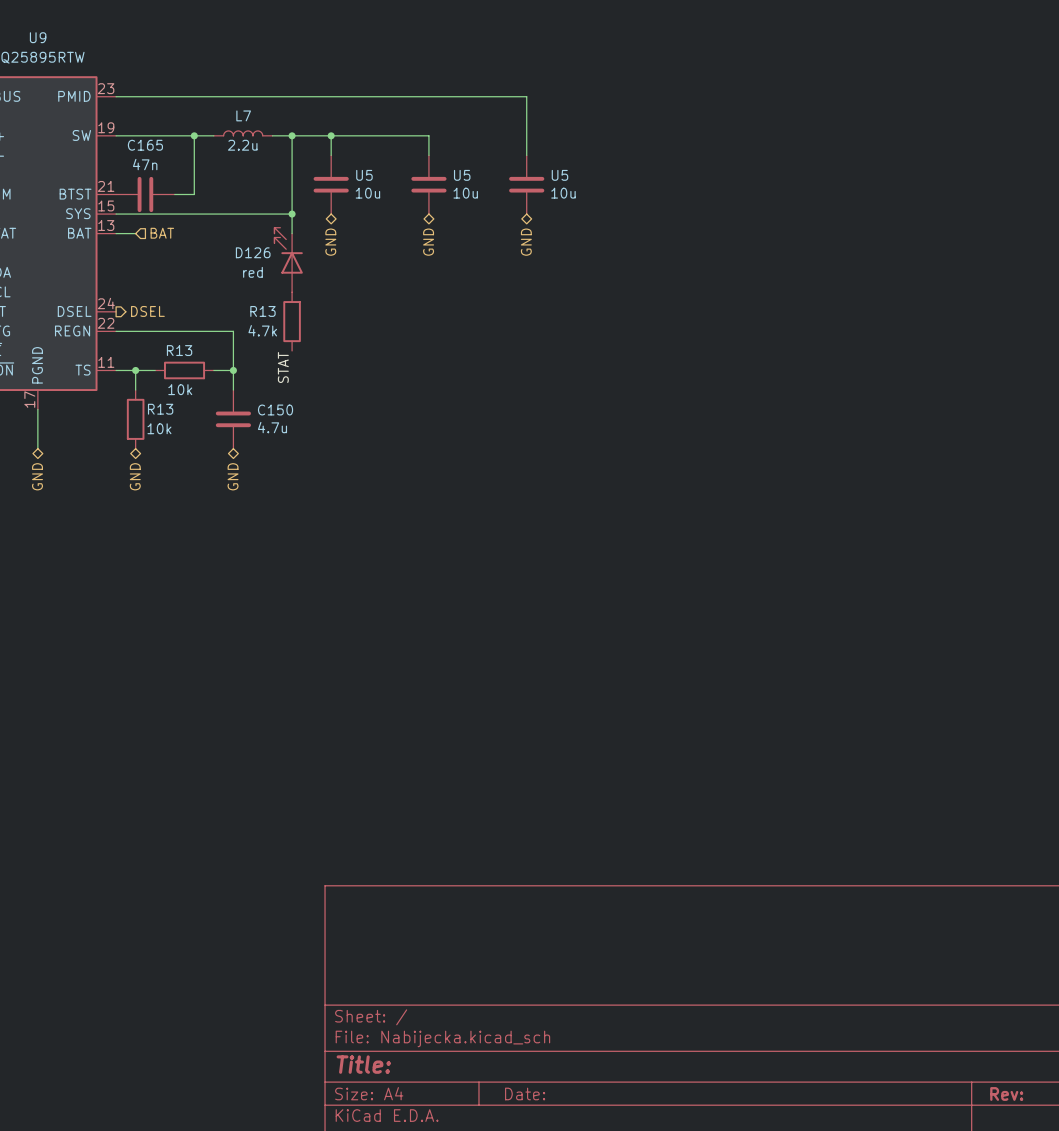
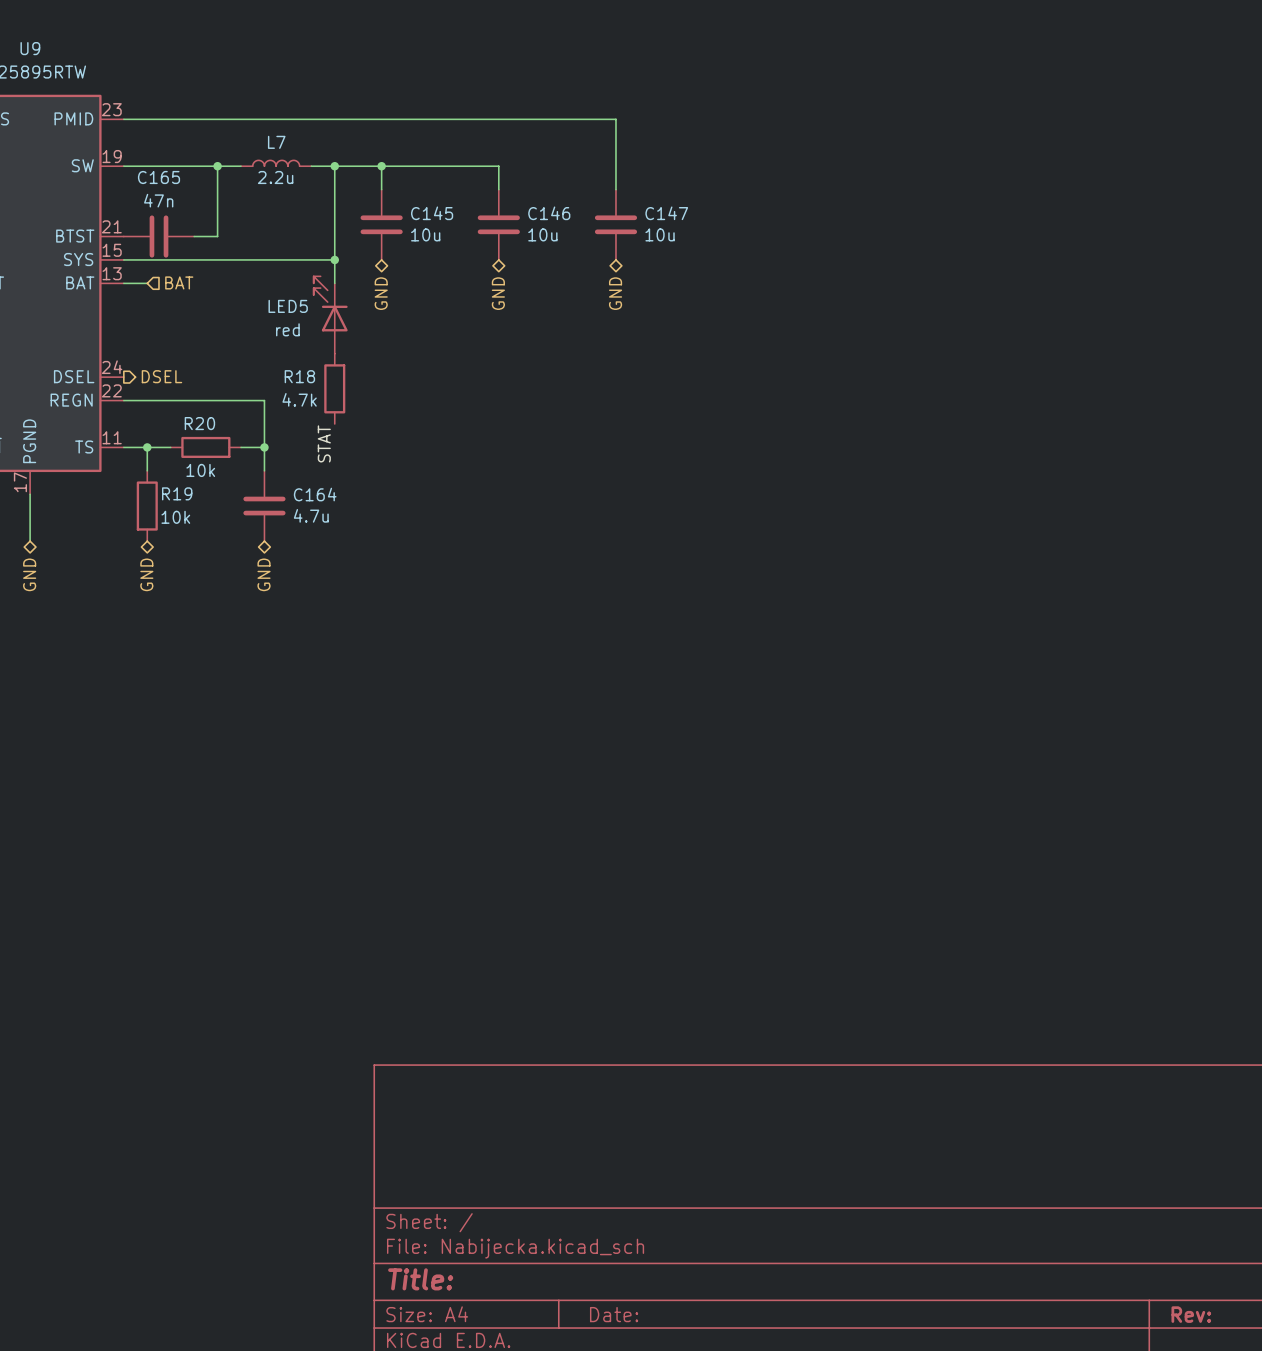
U5 name: U5 (364, 175) -> C145 (432, 213)
U5 name: U5 (462, 175) -> C146 (549, 213)
U5 name: U5 (559, 175) -> C147 (666, 213)
D126 name: D126 (253, 252) -> LED5 (288, 306)
R13 name: R13 (262, 311) -> R18 (299, 376)
R13 name: R13 (179, 350) -> R20 (199, 423)
R13 name: R13 (160, 409) -> R19 (177, 493)
C150 name: C150 (275, 410) -> C164 (315, 494)

